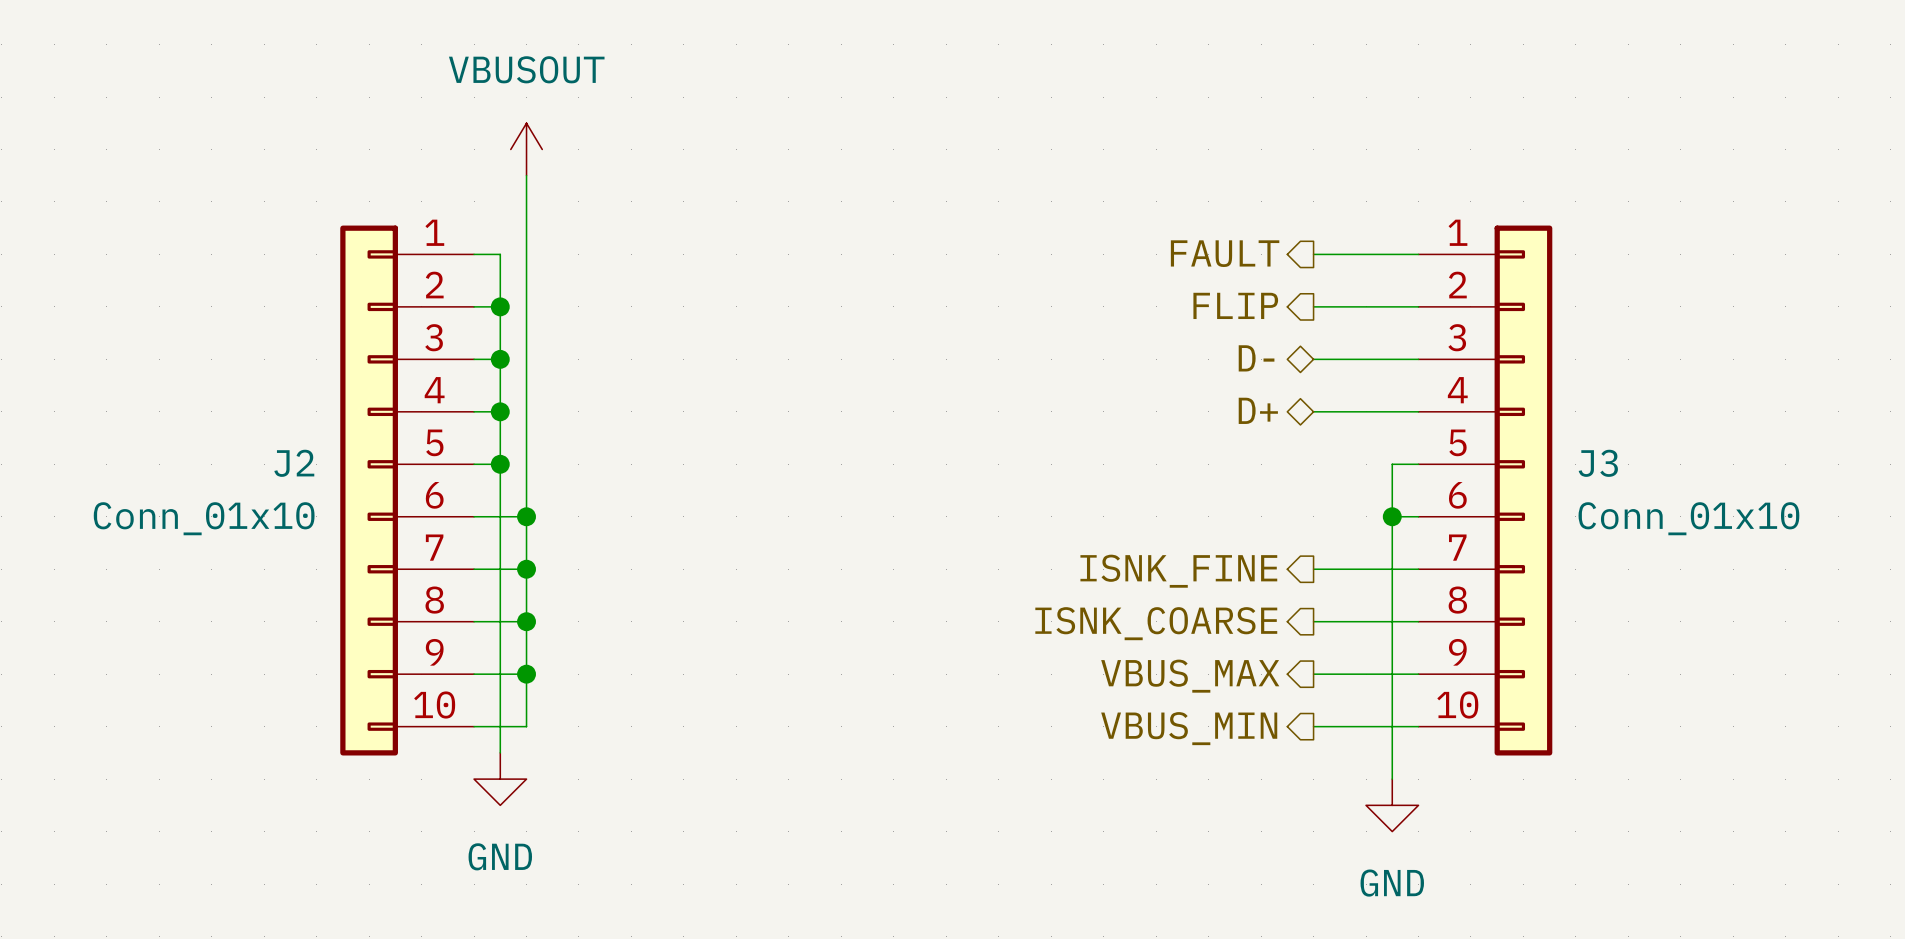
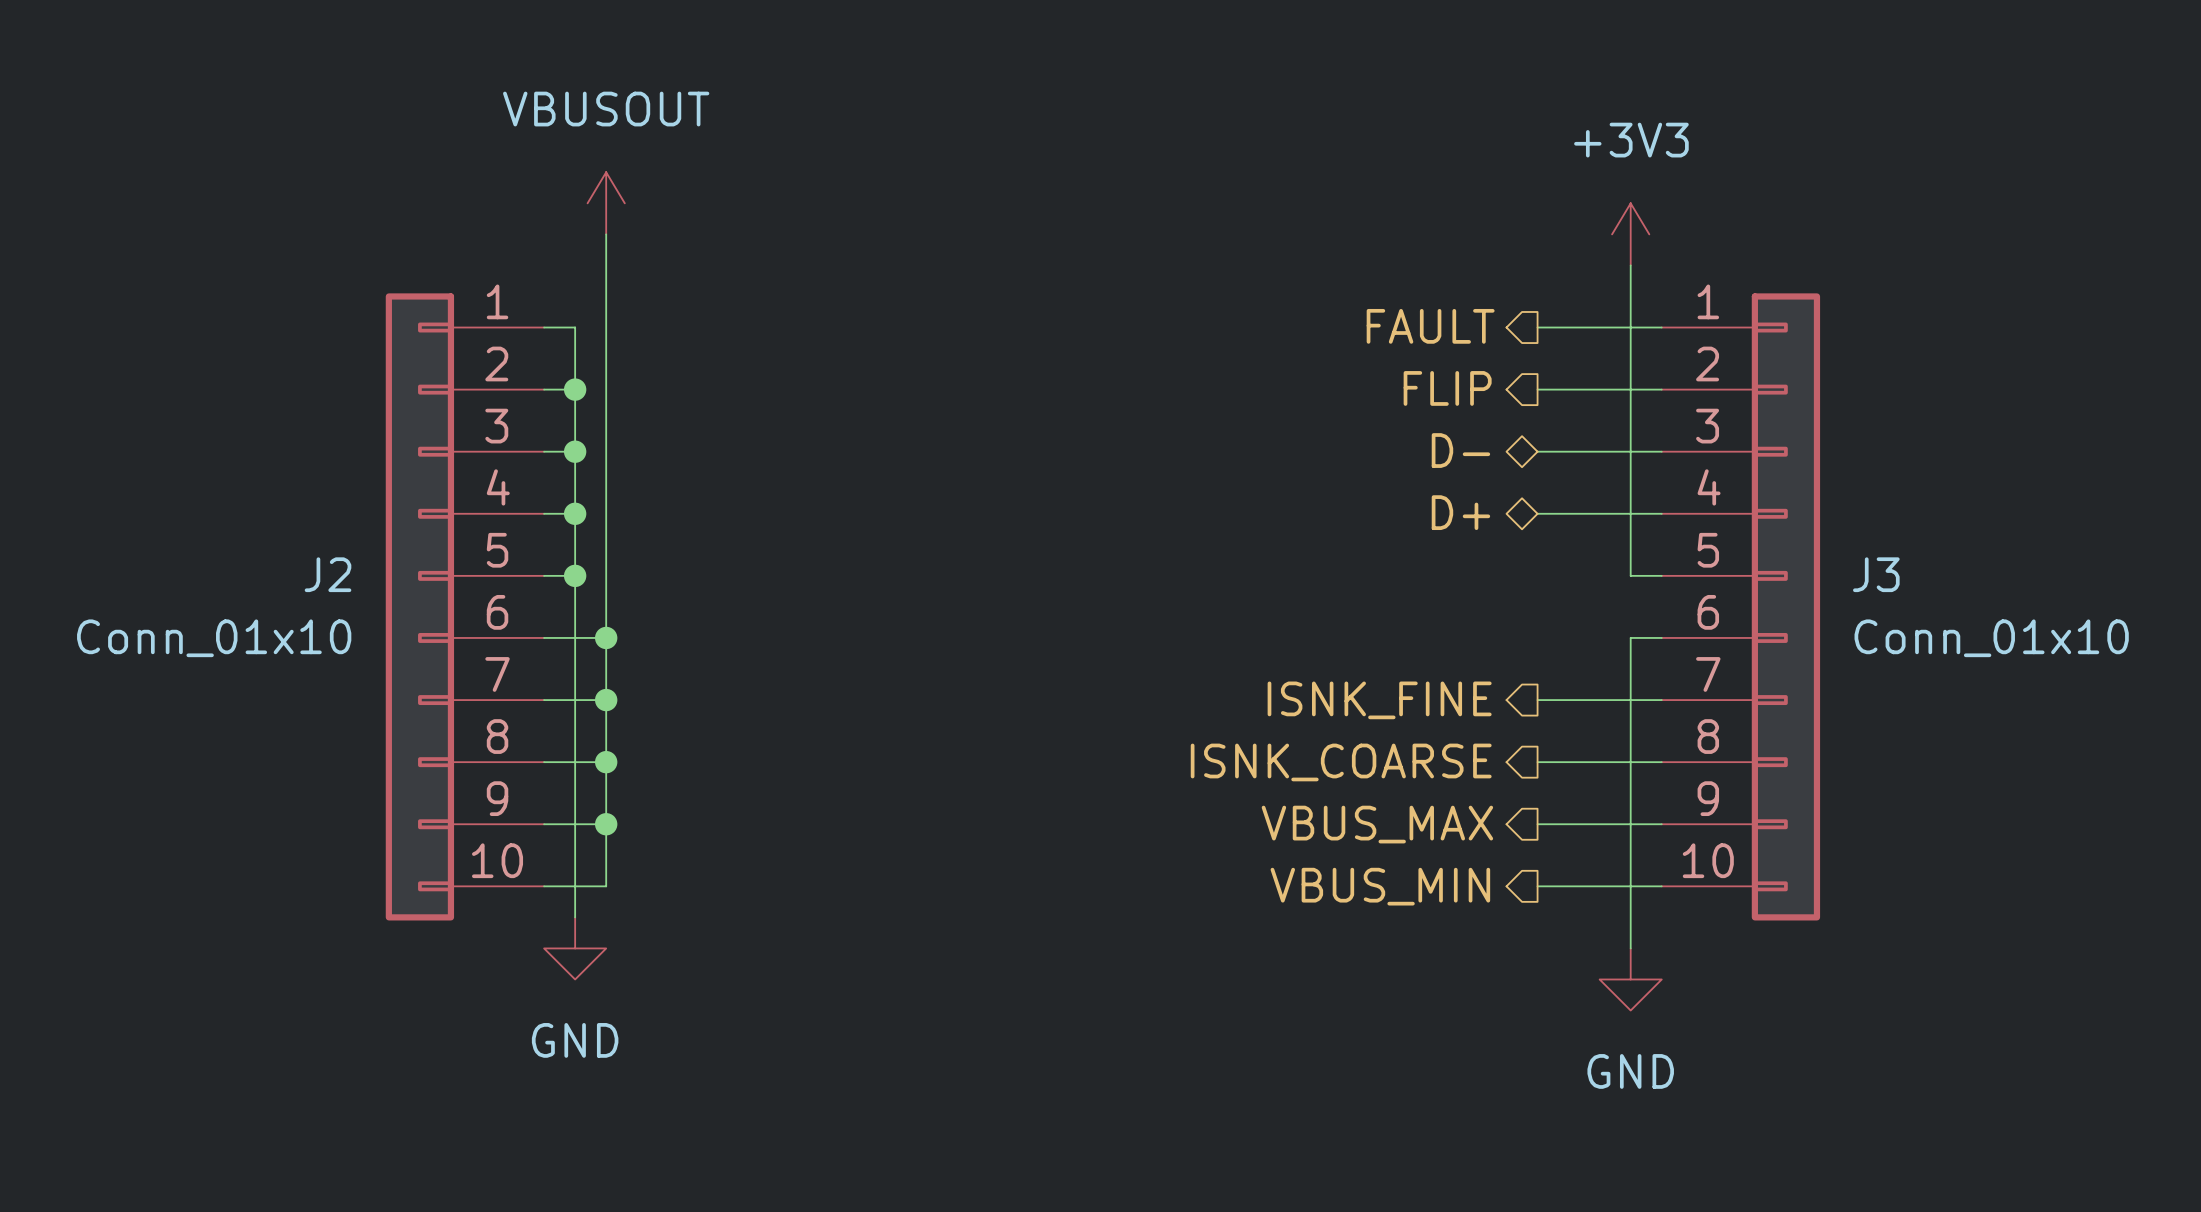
power symbol: none -> +3V3 (1630, 234)
wire: (1392, 464) (1392, 516) -> (1630, 575) (1630, 265)
junction: (1392, 516) -> none

